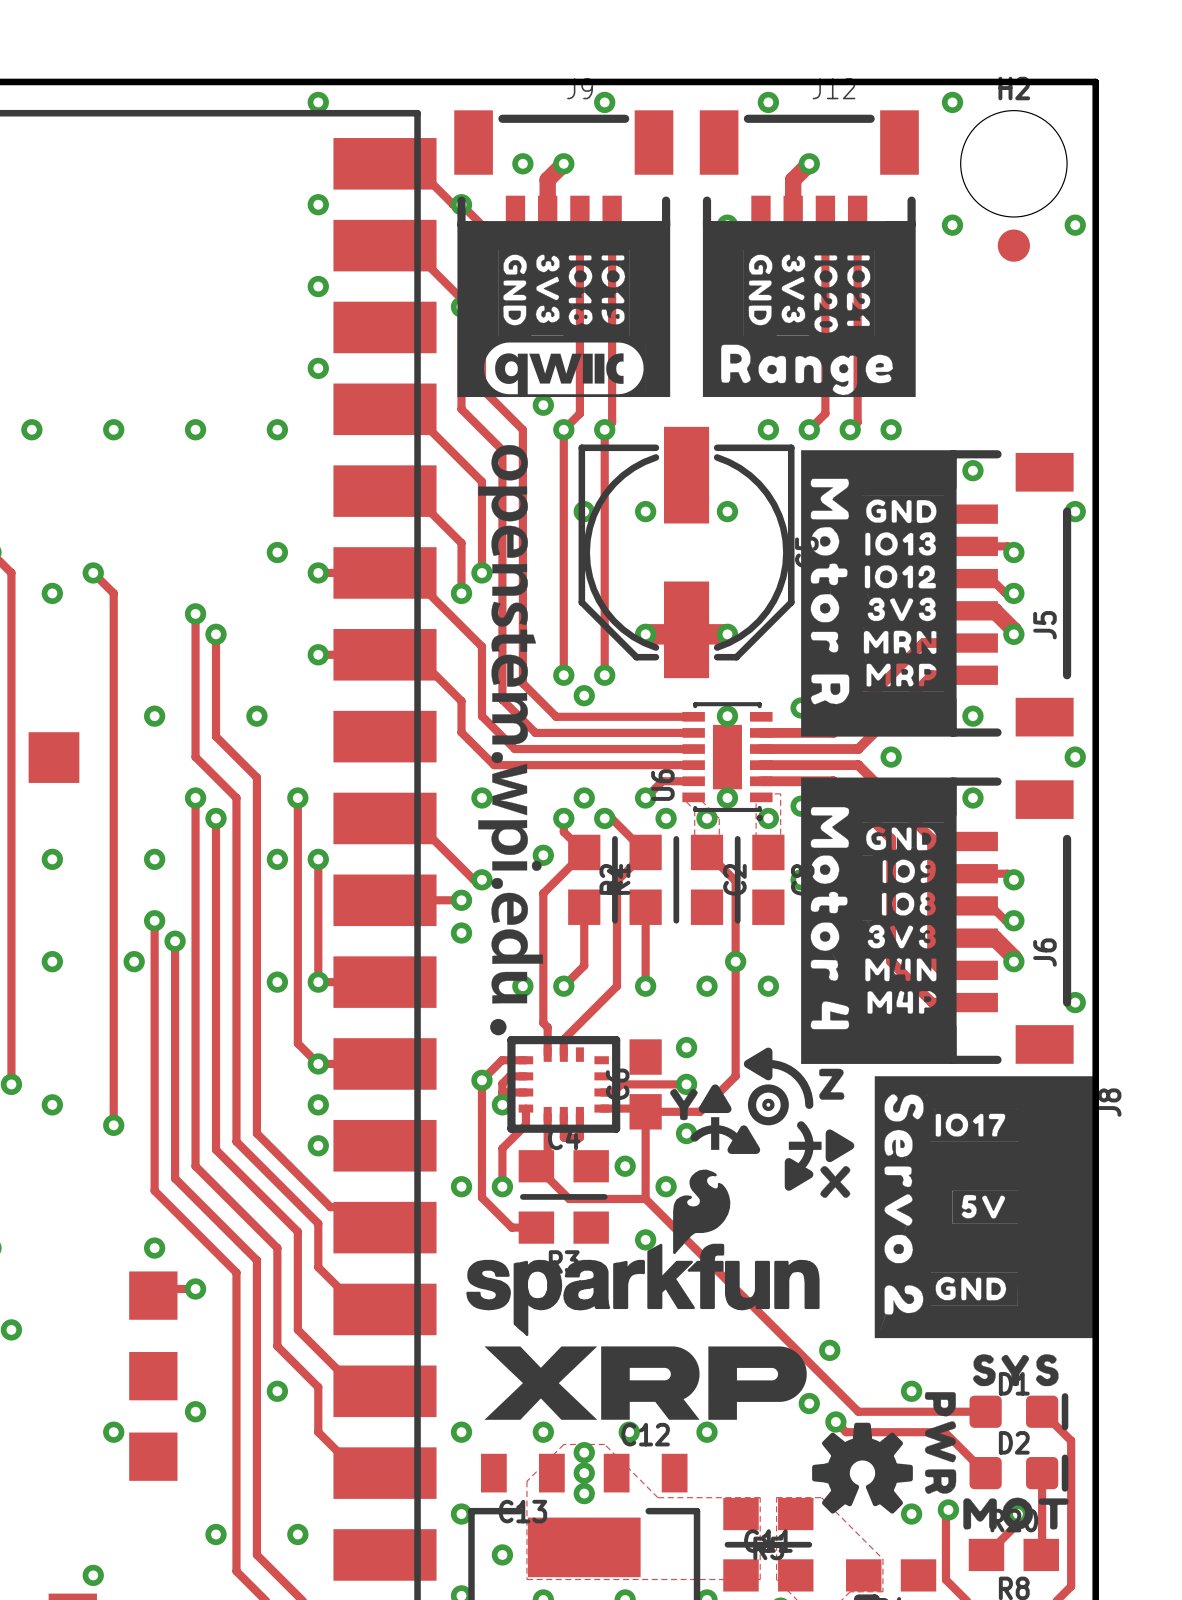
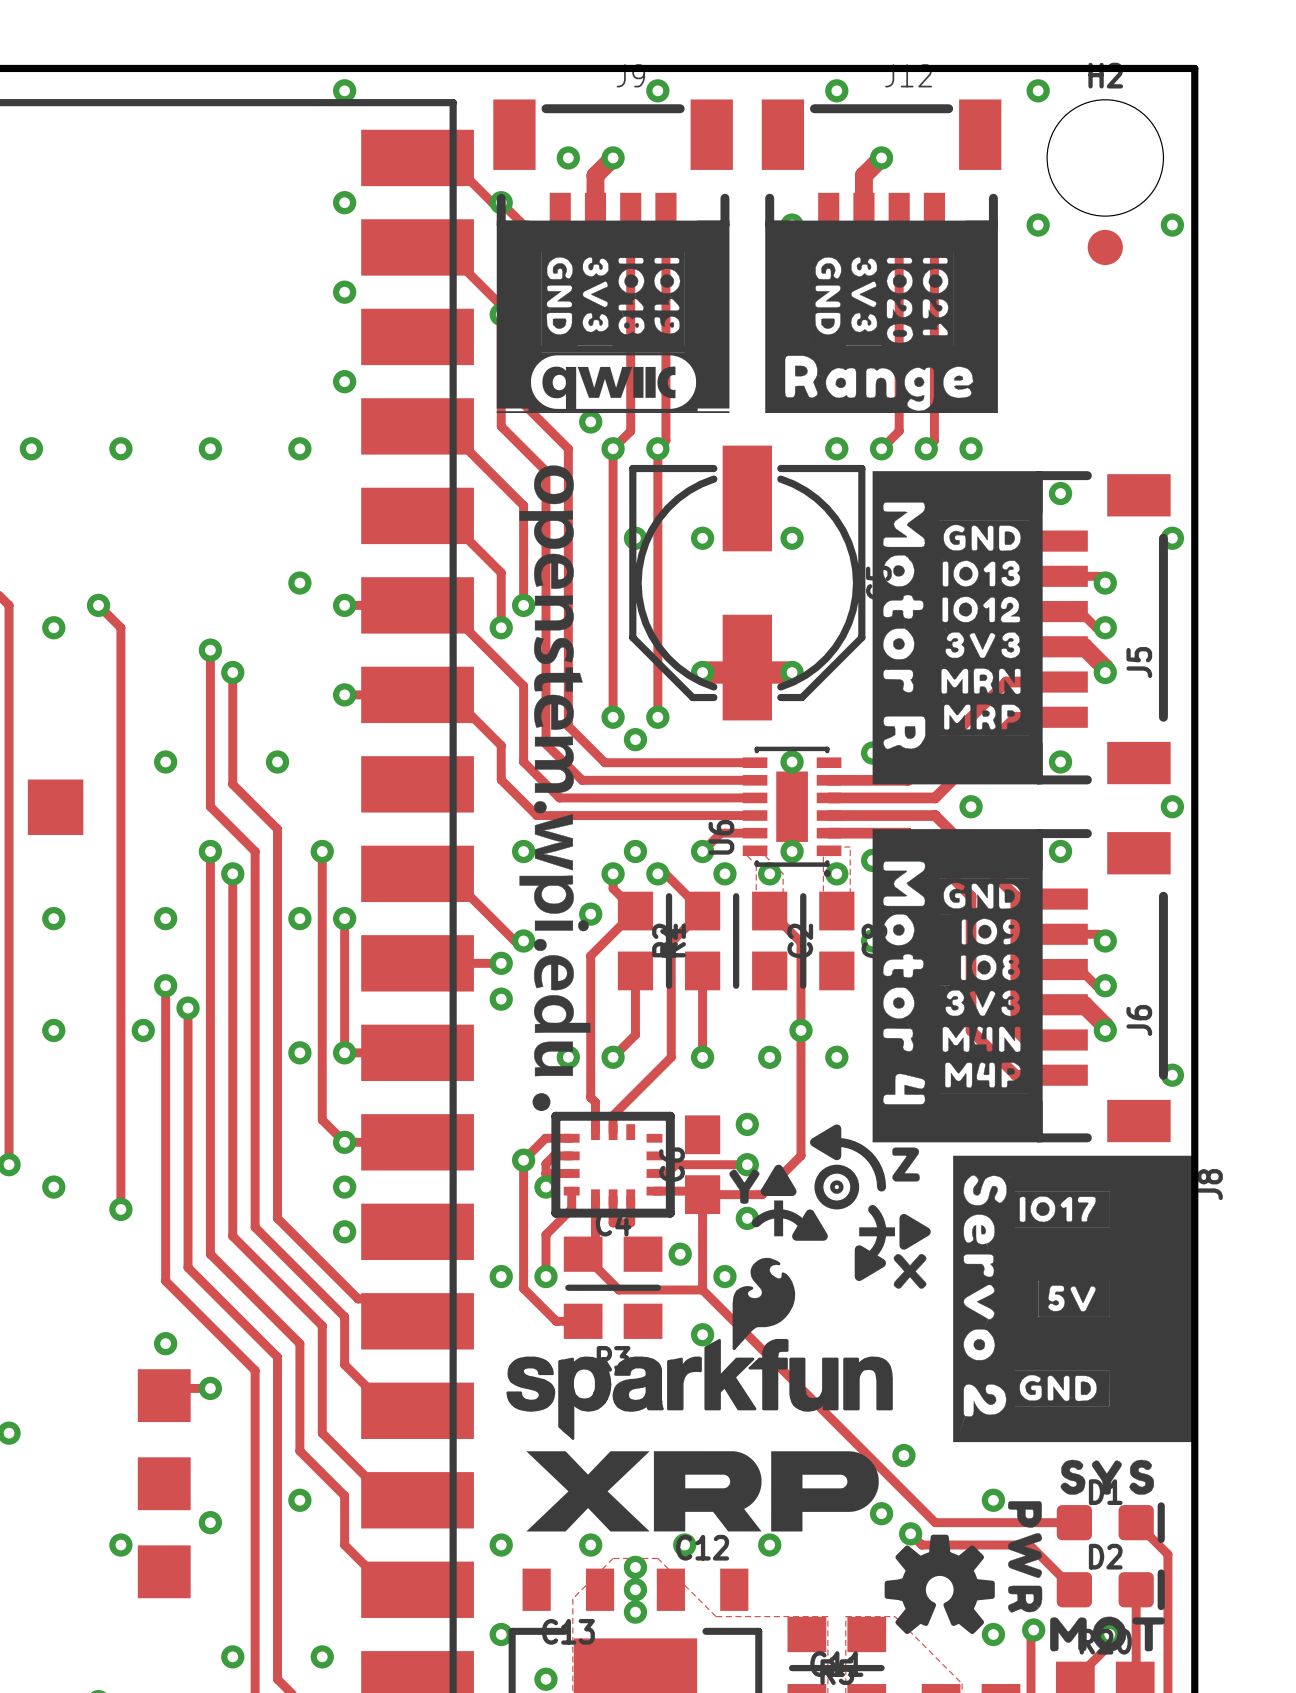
drawing shape: [481, 340, 646, 397] -> [528, 352, 698, 412]
drawing shape: [457, 343, 482, 396] -> [496, 354, 531, 409]
drawing shape: [645, 343, 671, 396] -> [696, 354, 730, 409]
drawing: none -> [542, 366, 676, 409]

